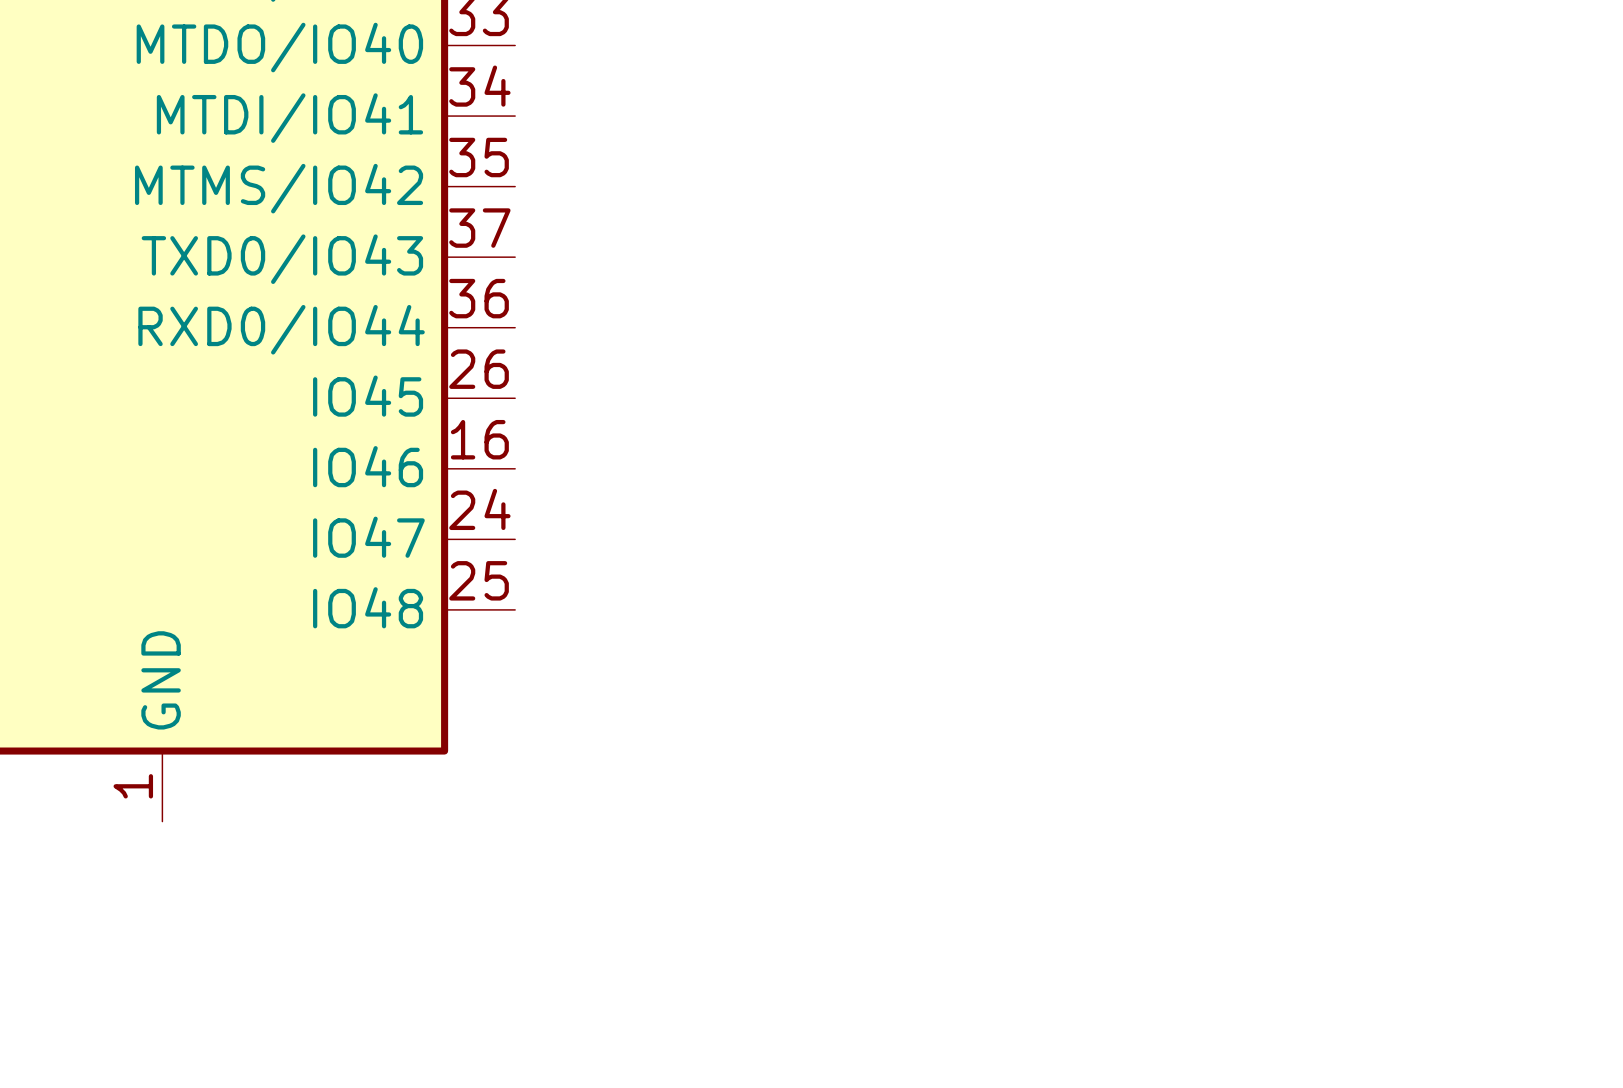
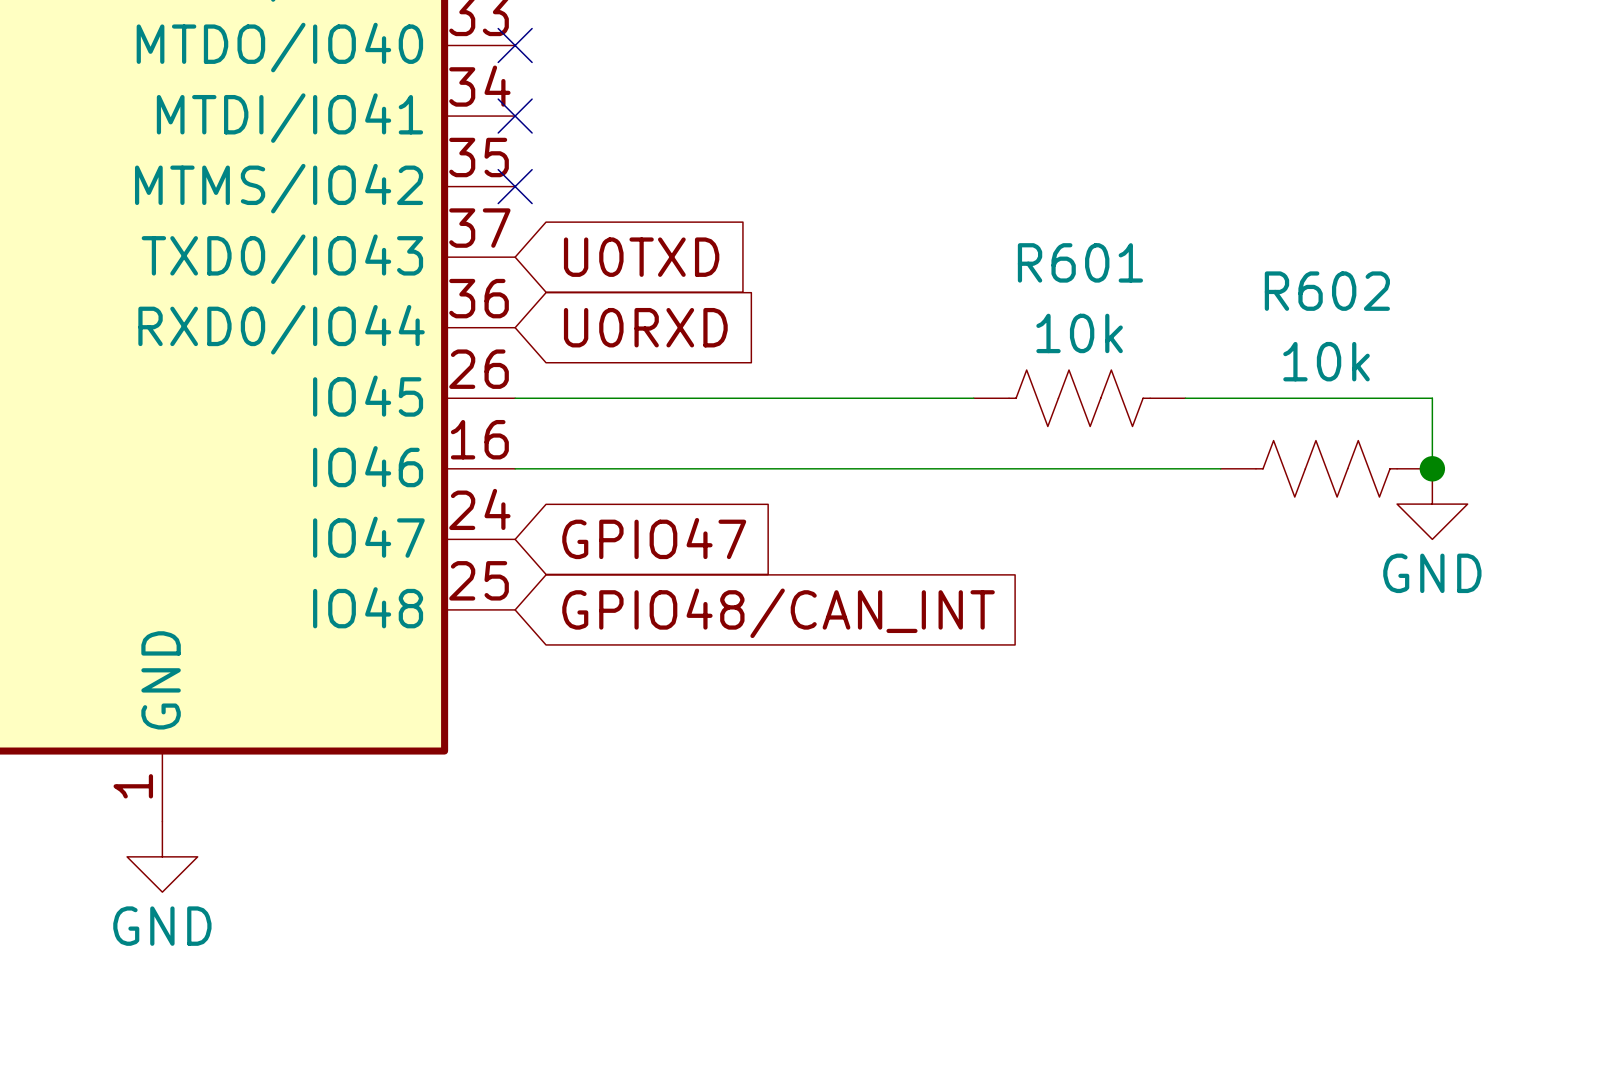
no-connect mark: none -> (515, 45)
no-connect mark: none -> (515, 116)
no-connect mark: none -> (515, 186)
global label: none -> U0TXD (641, 257)
global label: none -> U0RXD (645, 327)
wire: none -> (515, 398) (973, 398)
R601: none -> 10k (1079, 398)
wire: none -> (1185, 398) (1432, 398) (1432, 468)
wire: none -> (515, 468) (1220, 468)
R602: none -> 10k (1326, 468)
junction: none -> (1432, 468)
power symbol: none -> GND (1432, 504)
global label: none -> GPIO47 (654, 538)
global label: none -> GPIO48/CAN_INT (778, 613)
power symbol: none -> GND (162, 856)

